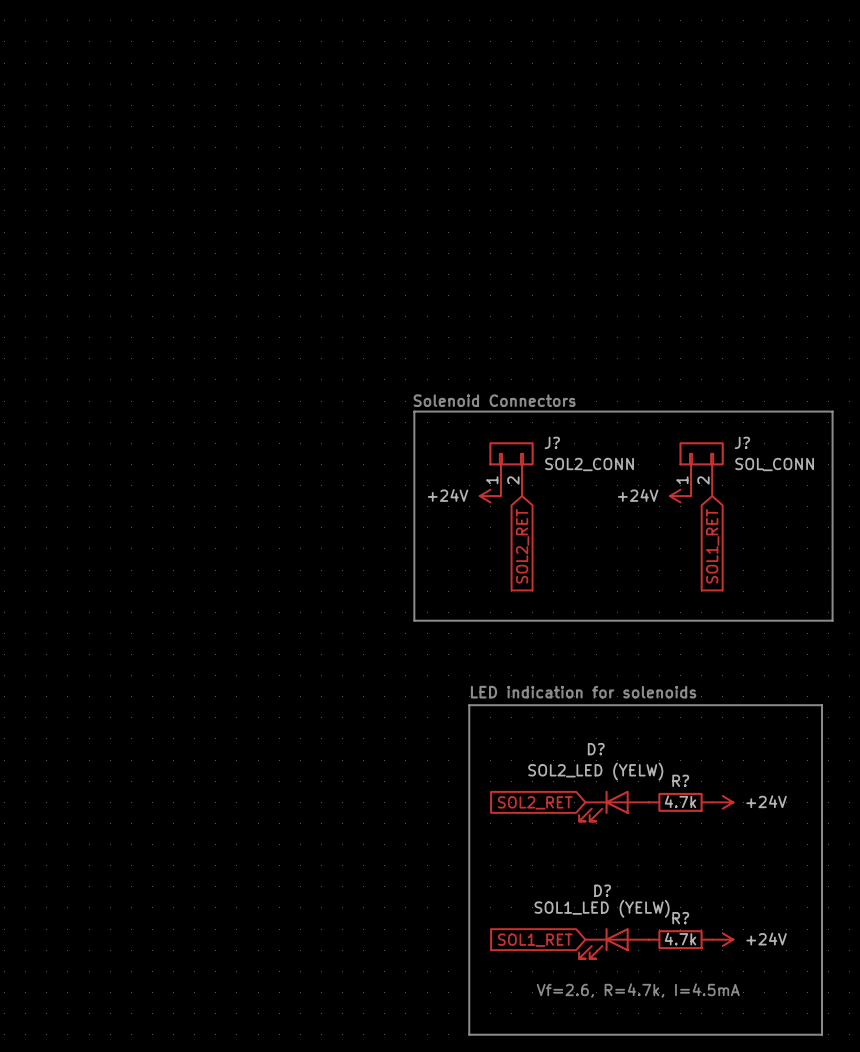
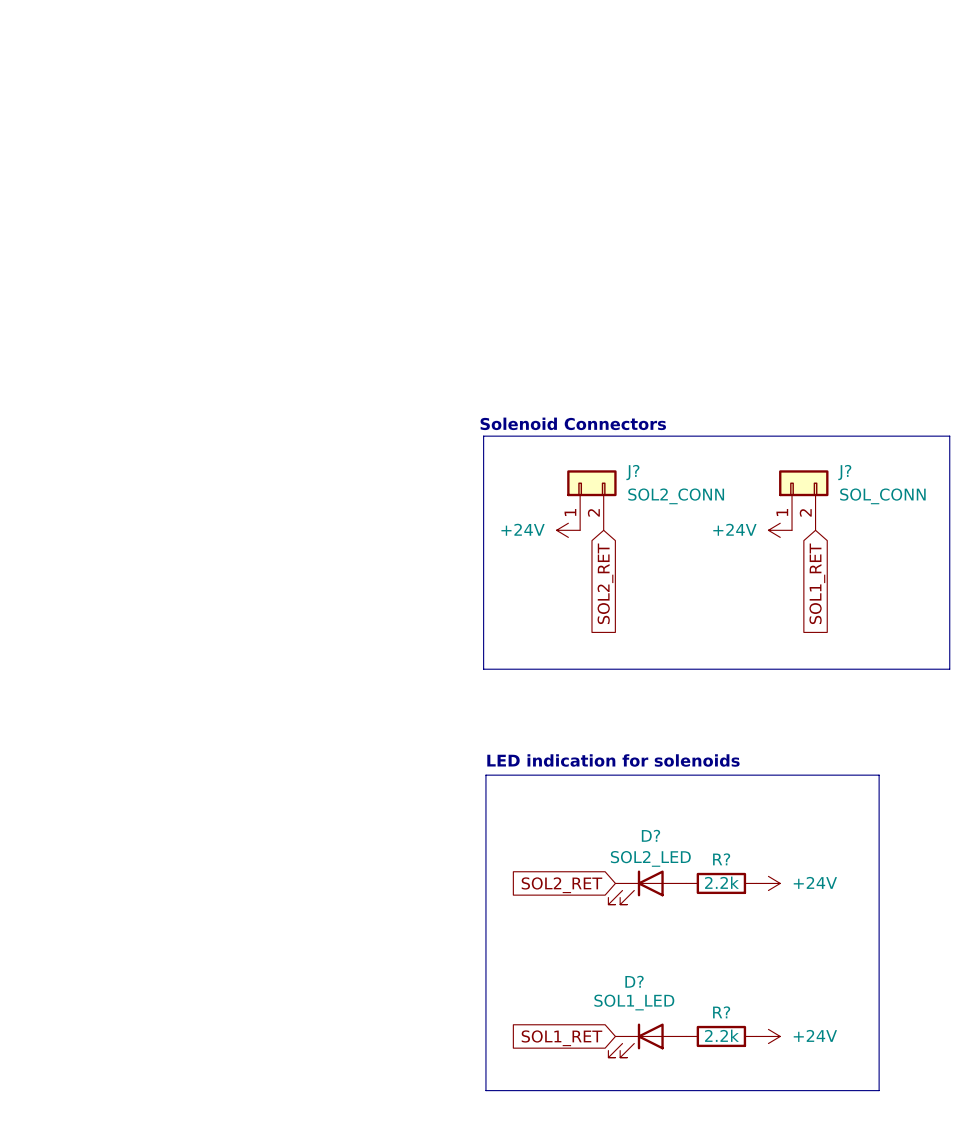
text position: LED indication for solenoids (583, 692) -> LED indication for solenoids (613, 760)
line: (469, 705) (822, 705) (822, 1034) (469, 1034) (469, 705) -> (485, 775) (485, 1090) (879, 1090) (879, 775) (485, 775)
global label position: SOL2_RET (535, 802) -> SOL2_RET (561, 885)
R?: 4.7k (680, 802) -> none
power symbol position: +24V (722, 802) -> +24V (768, 883)
D?: SOL2_LED (YELW) (613, 806) -> none
R?: none -> 2.2k (721, 883)
D?: none -> SOL2_LED (647, 887)
R?: 4.7k (680, 939) -> none
power symbol position: +24V (722, 939) -> +24V (768, 1036)
global label position: SOL1_RET (535, 940) -> SOL1_RET (561, 1038)
D?: SOL1_LED (YELW) (613, 943) -> none
R?: none -> 2.2k (721, 1036)
D?: none -> SOL1_LED (647, 1040)
text: Vf=2.6, R=4.7k, I=4.5mA (638, 990) -> none

